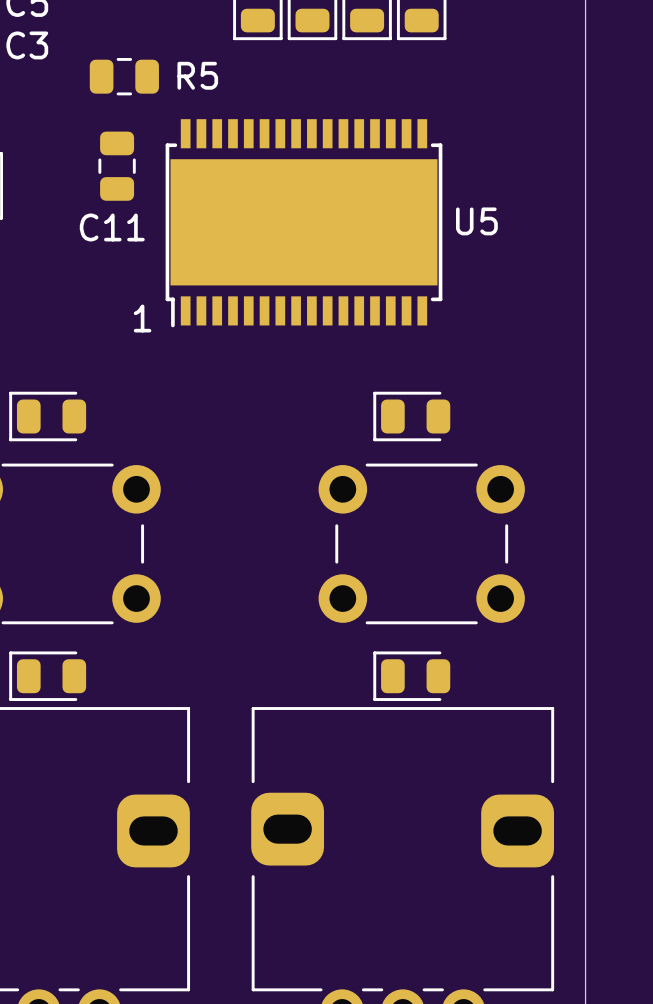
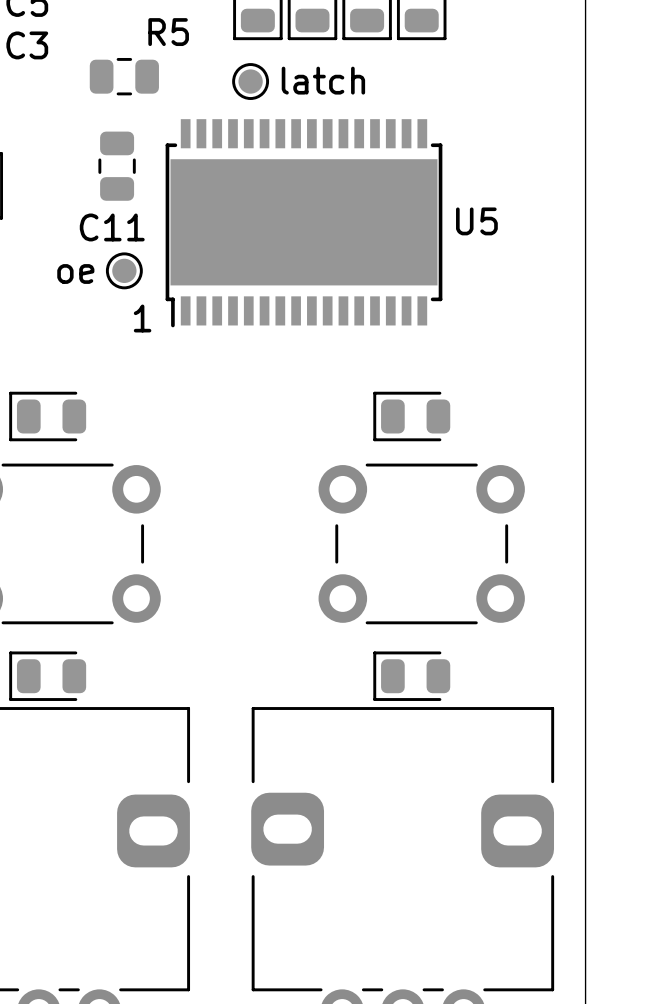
R5 name position: R5 (197, 75) -> R5 (168, 32)
text: none -> latch (323, 80)
part: none -> (250, 81)
part: none -> (124, 270)
text: none -> oe (75, 274)

